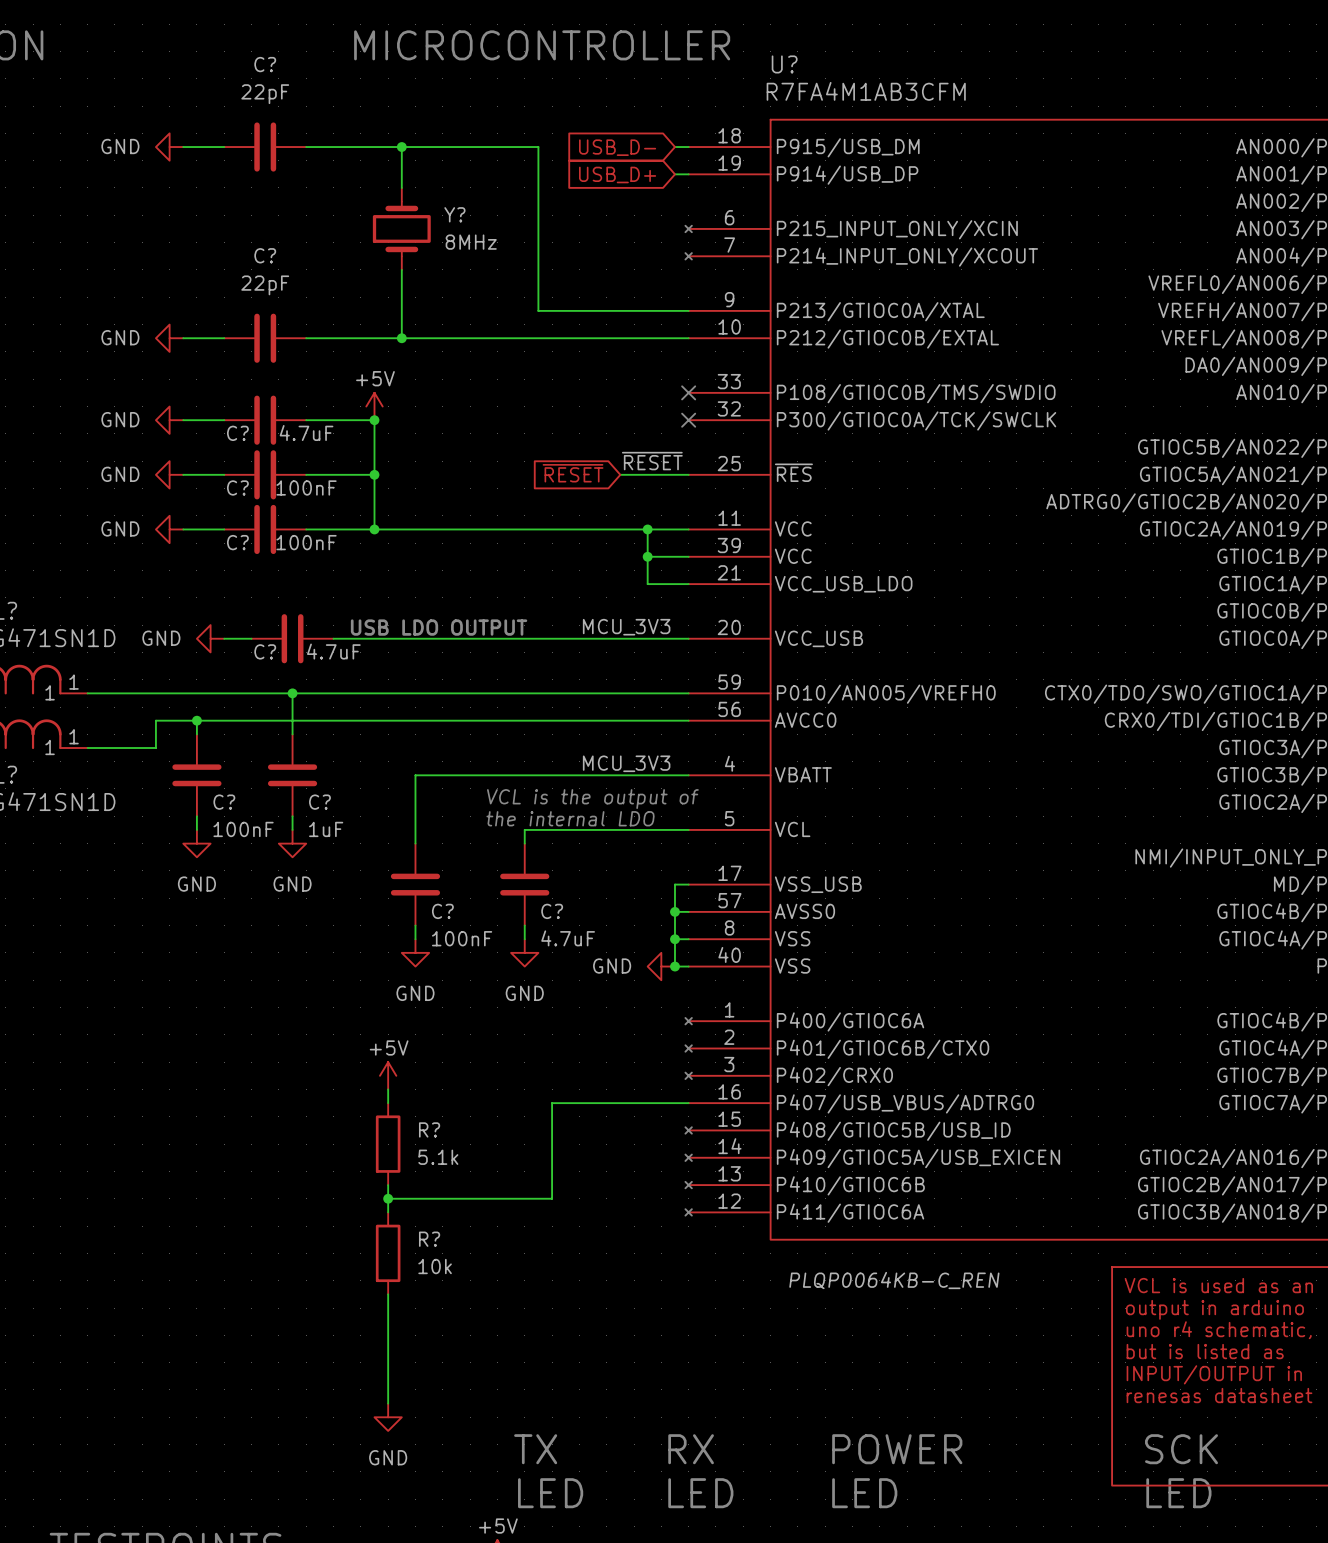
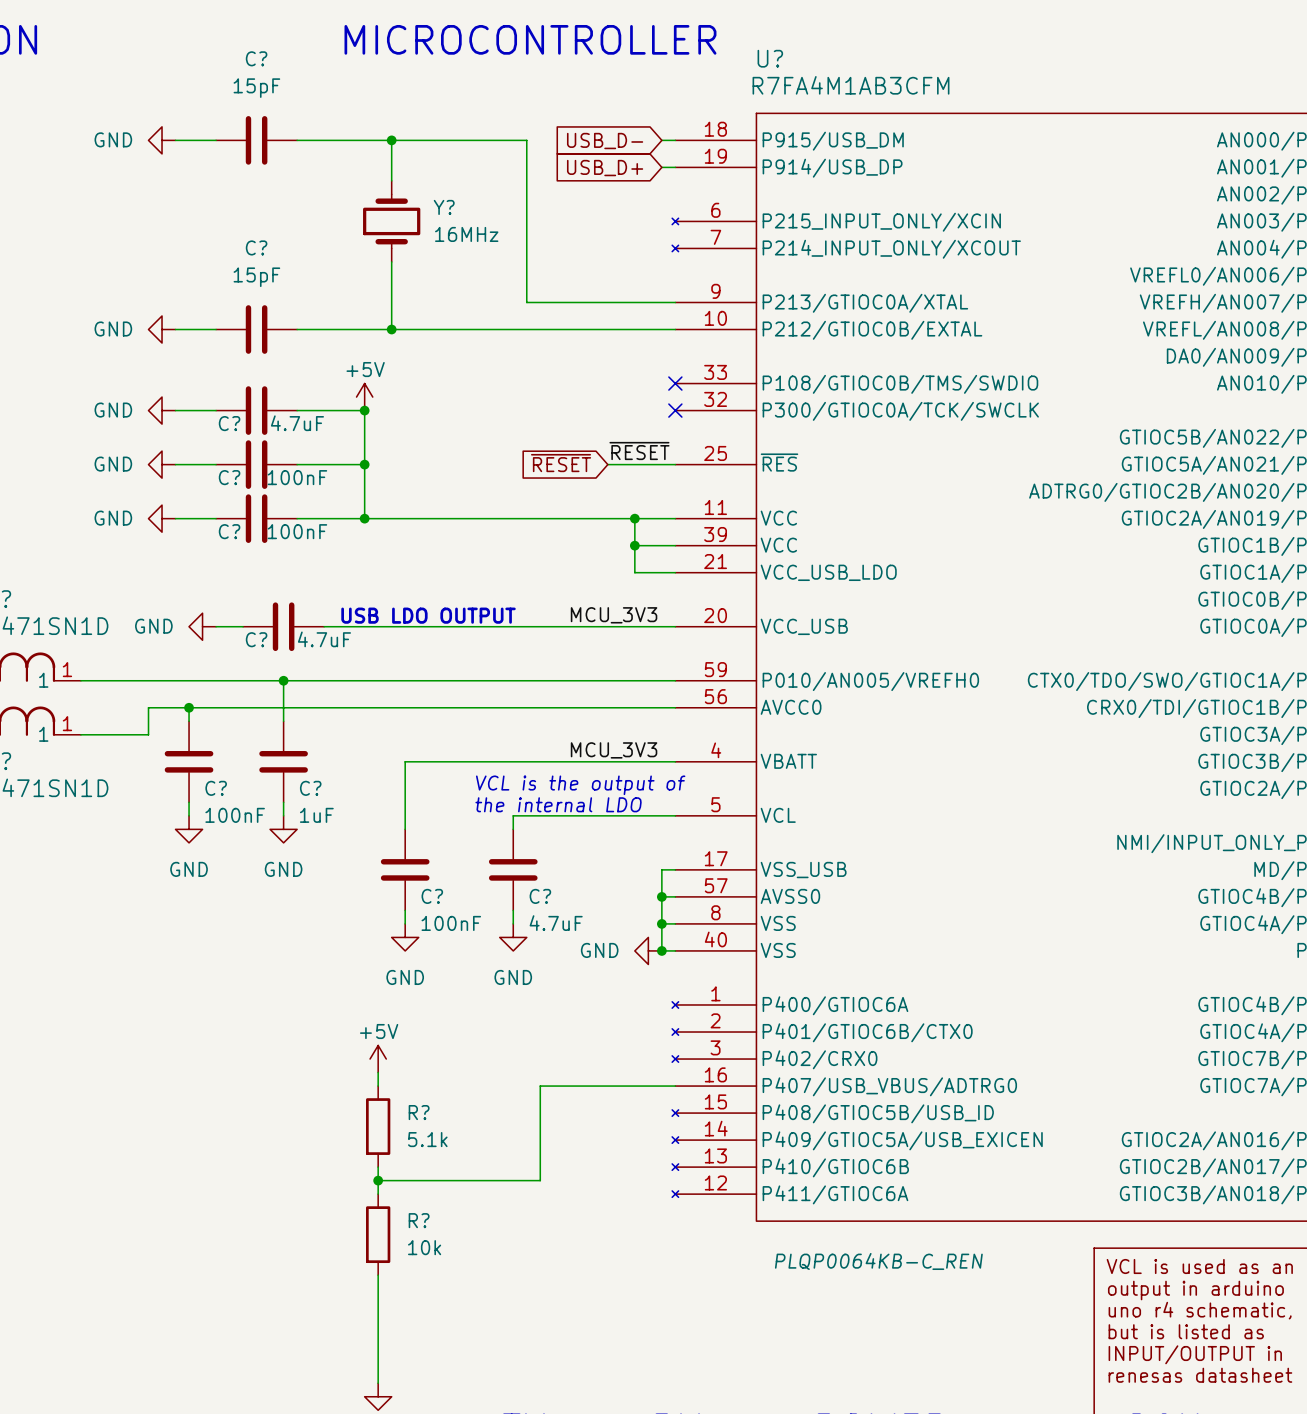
C? value: 22pF (265, 94) -> 15pF (256, 88)
Y? value: 8MHz (471, 242) -> 16MHz (466, 234)
C? value: 22pF (265, 285) -> 15pF (256, 277)

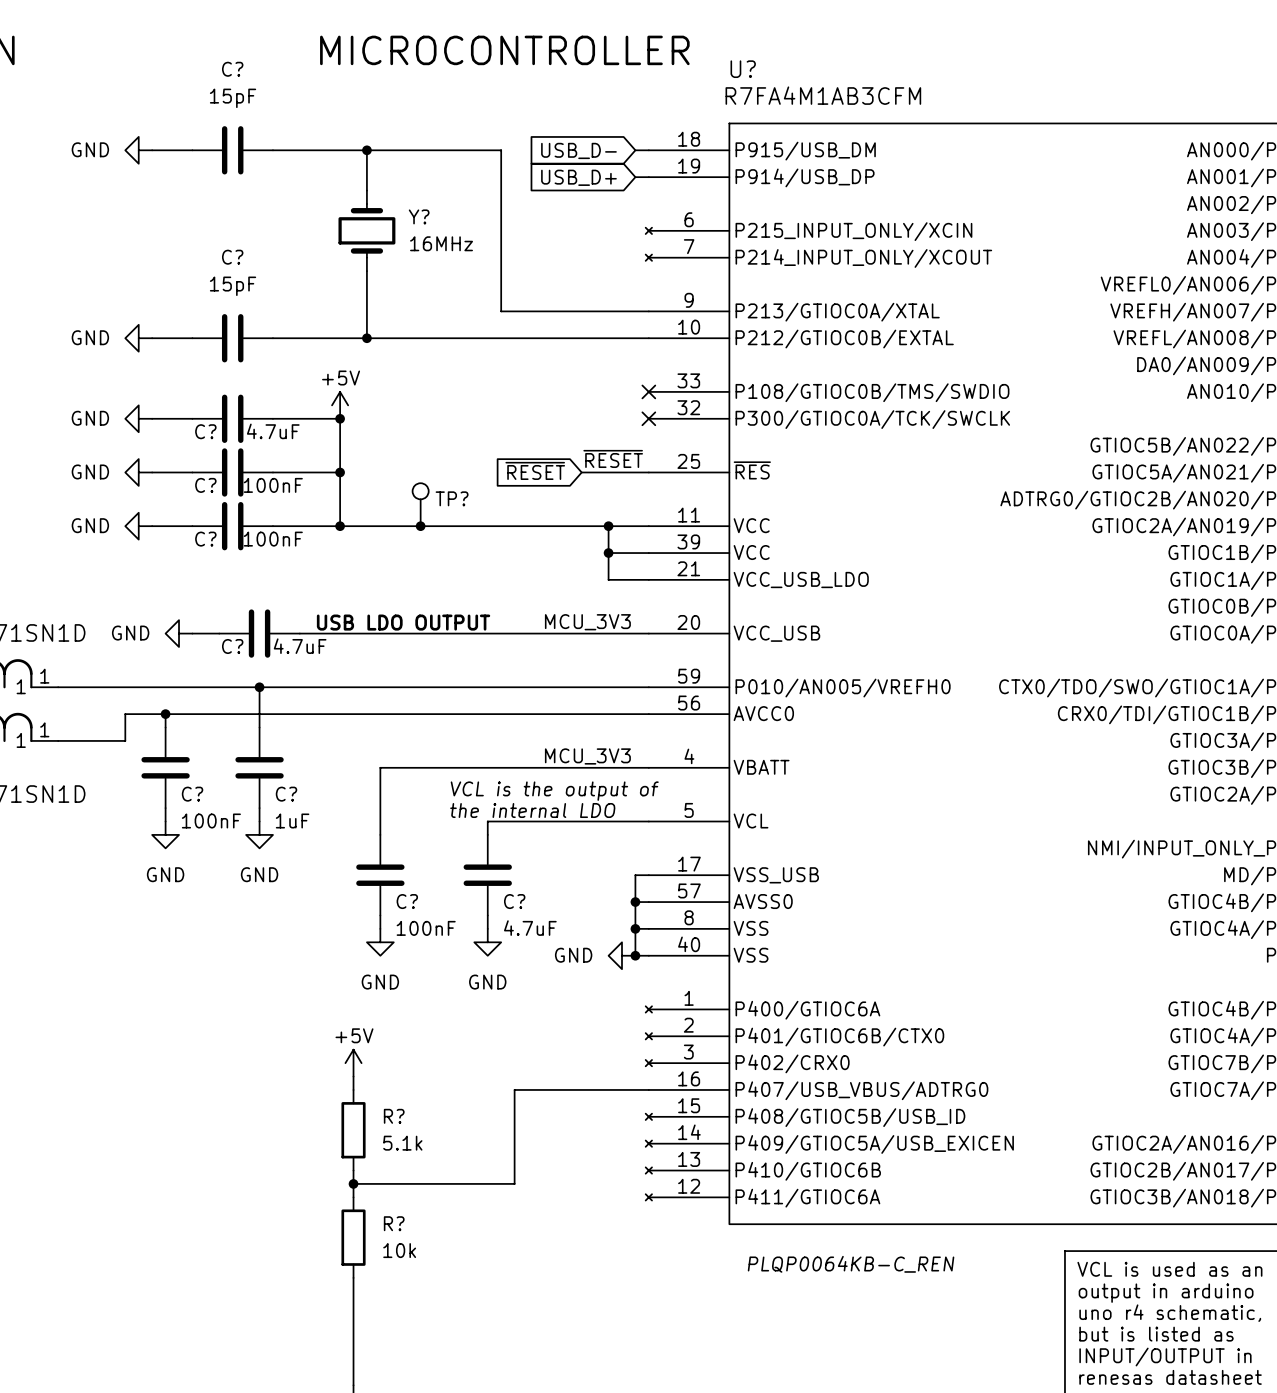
TP?: none -> (420, 504)
junction: none -> (420, 526)

